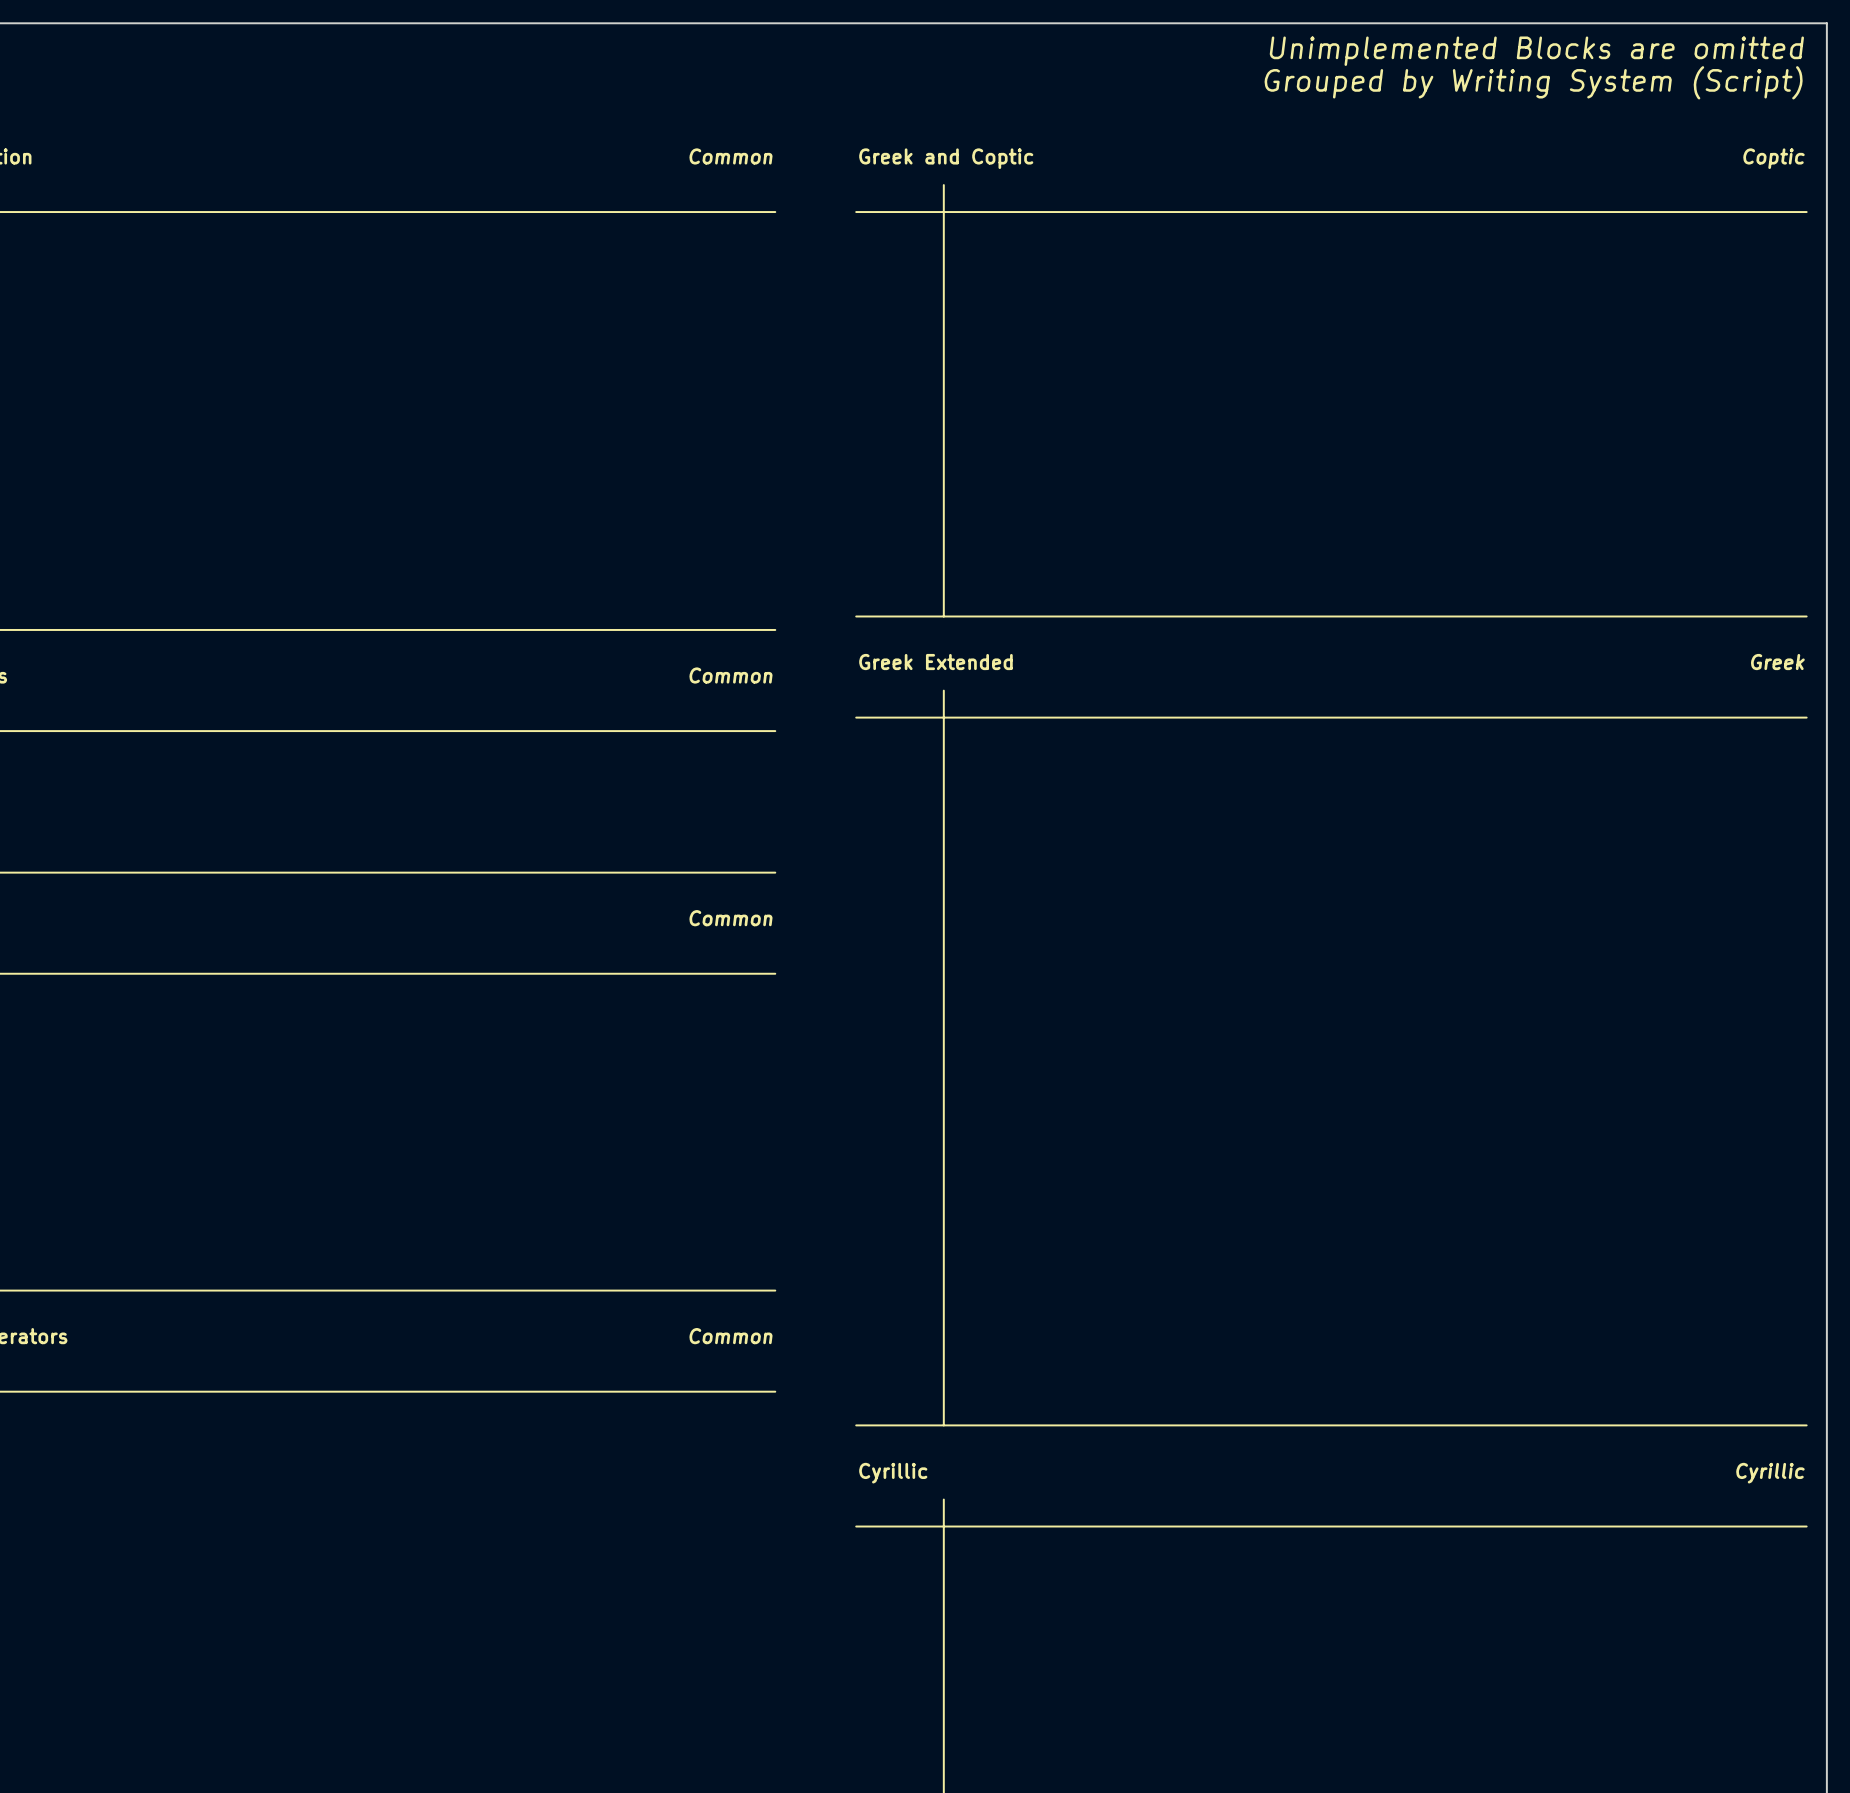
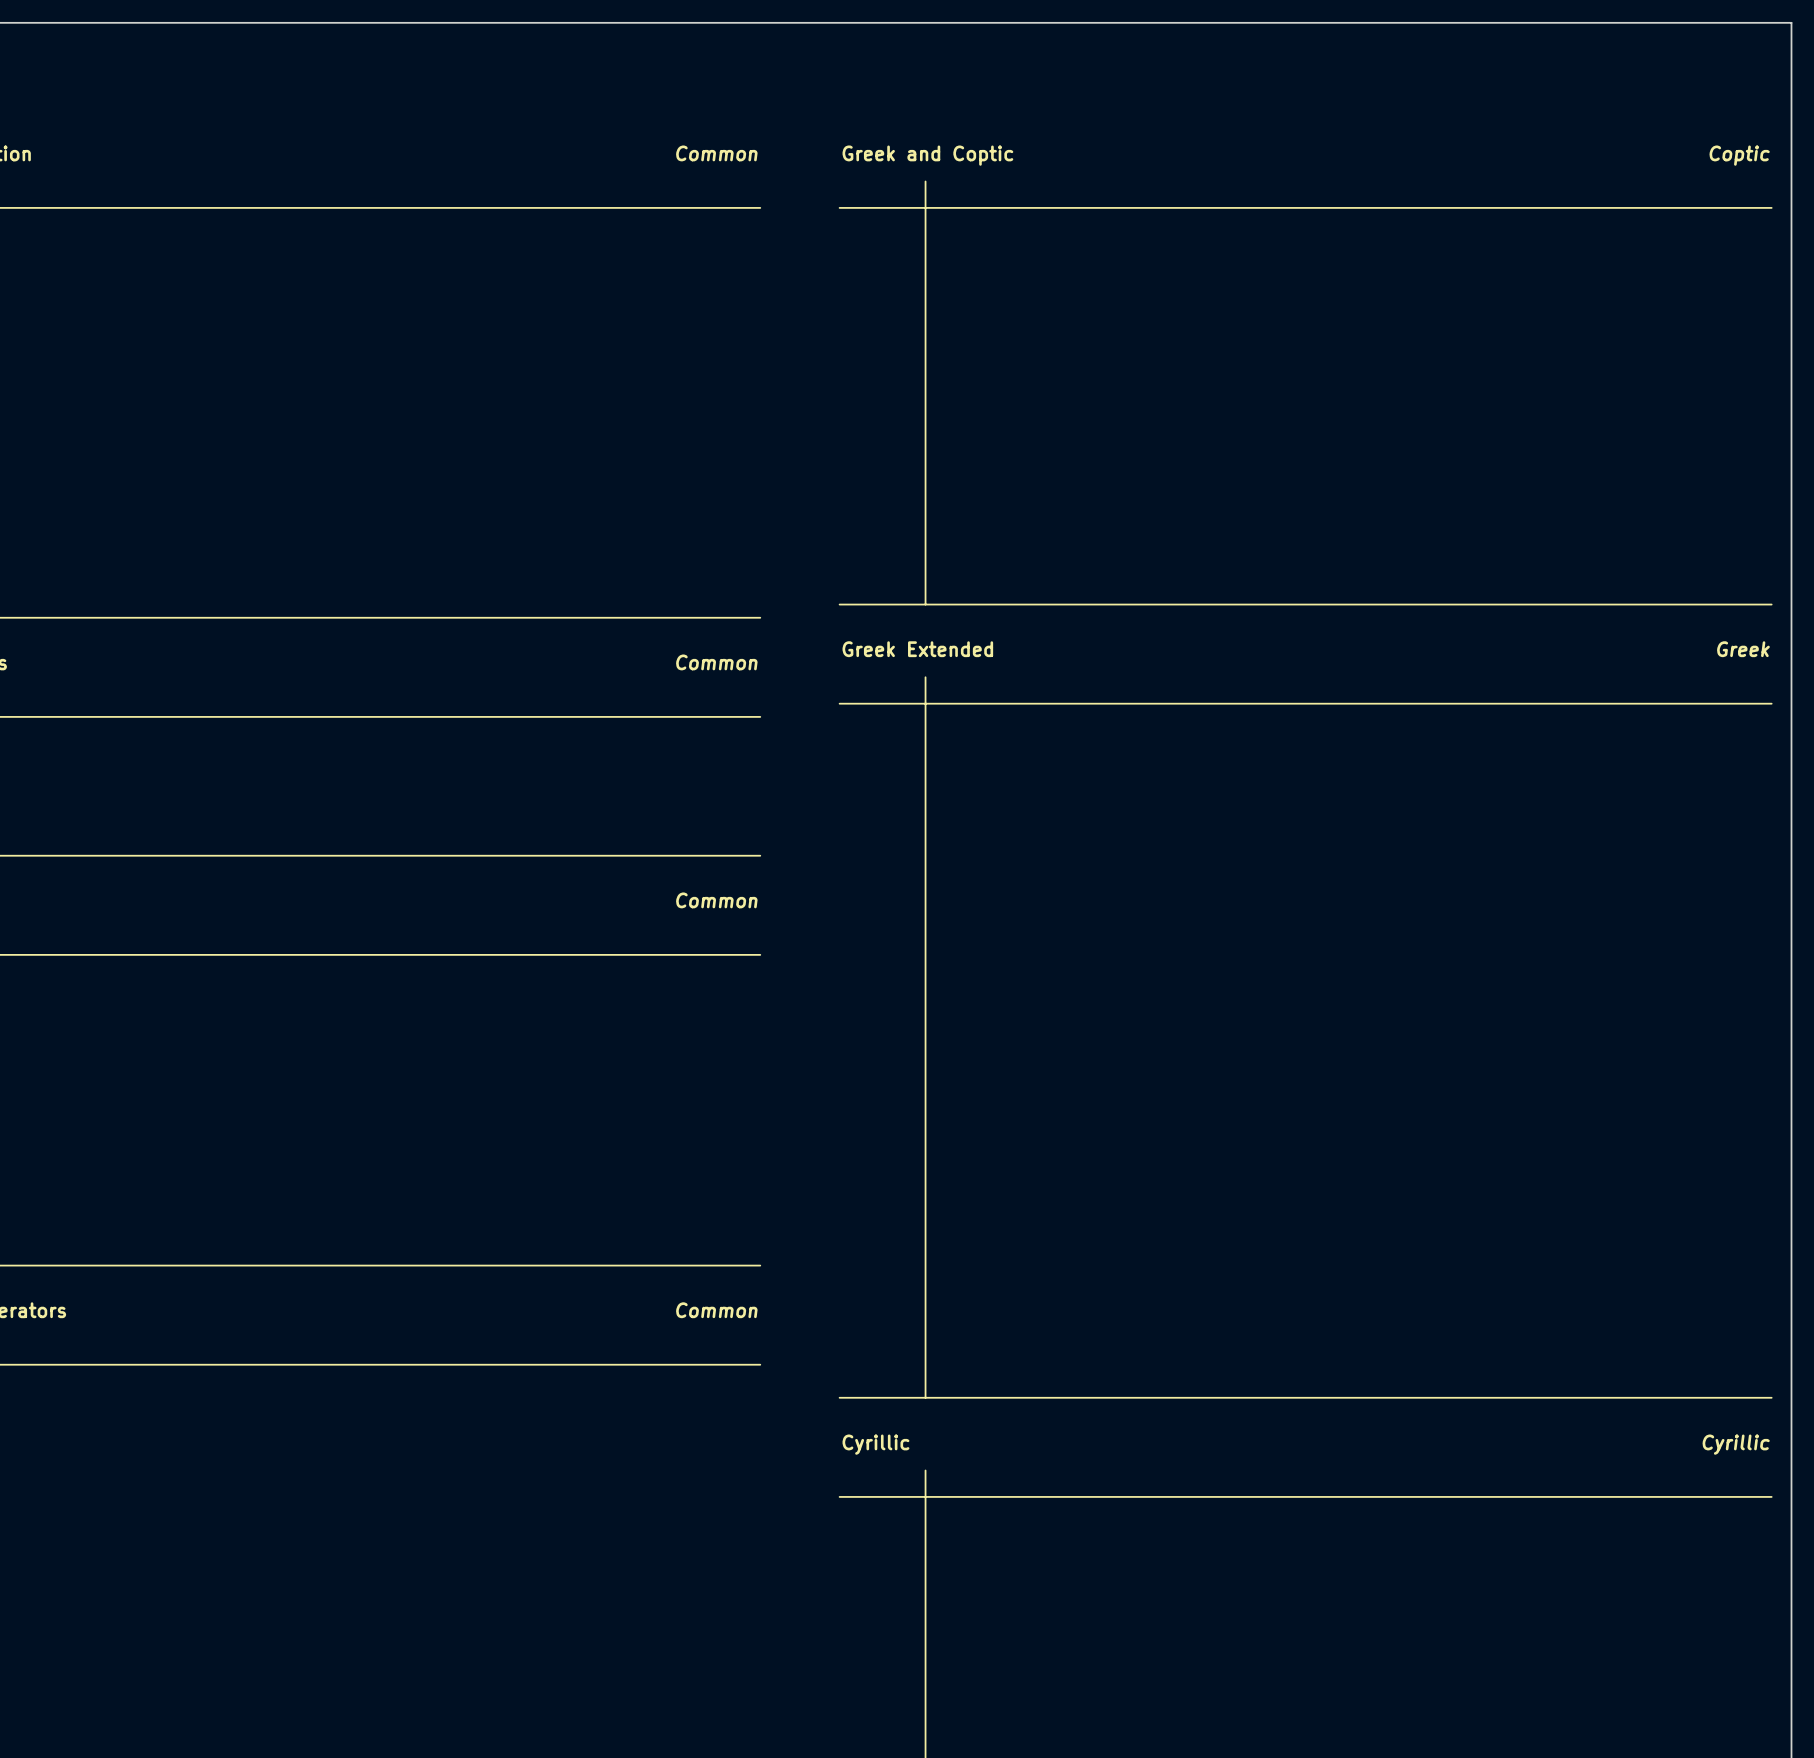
text: Unimplemented Blocks are omitted (1536, 51) -> none
text: Grouped by Writing System (Script) (1533, 82) -> none

